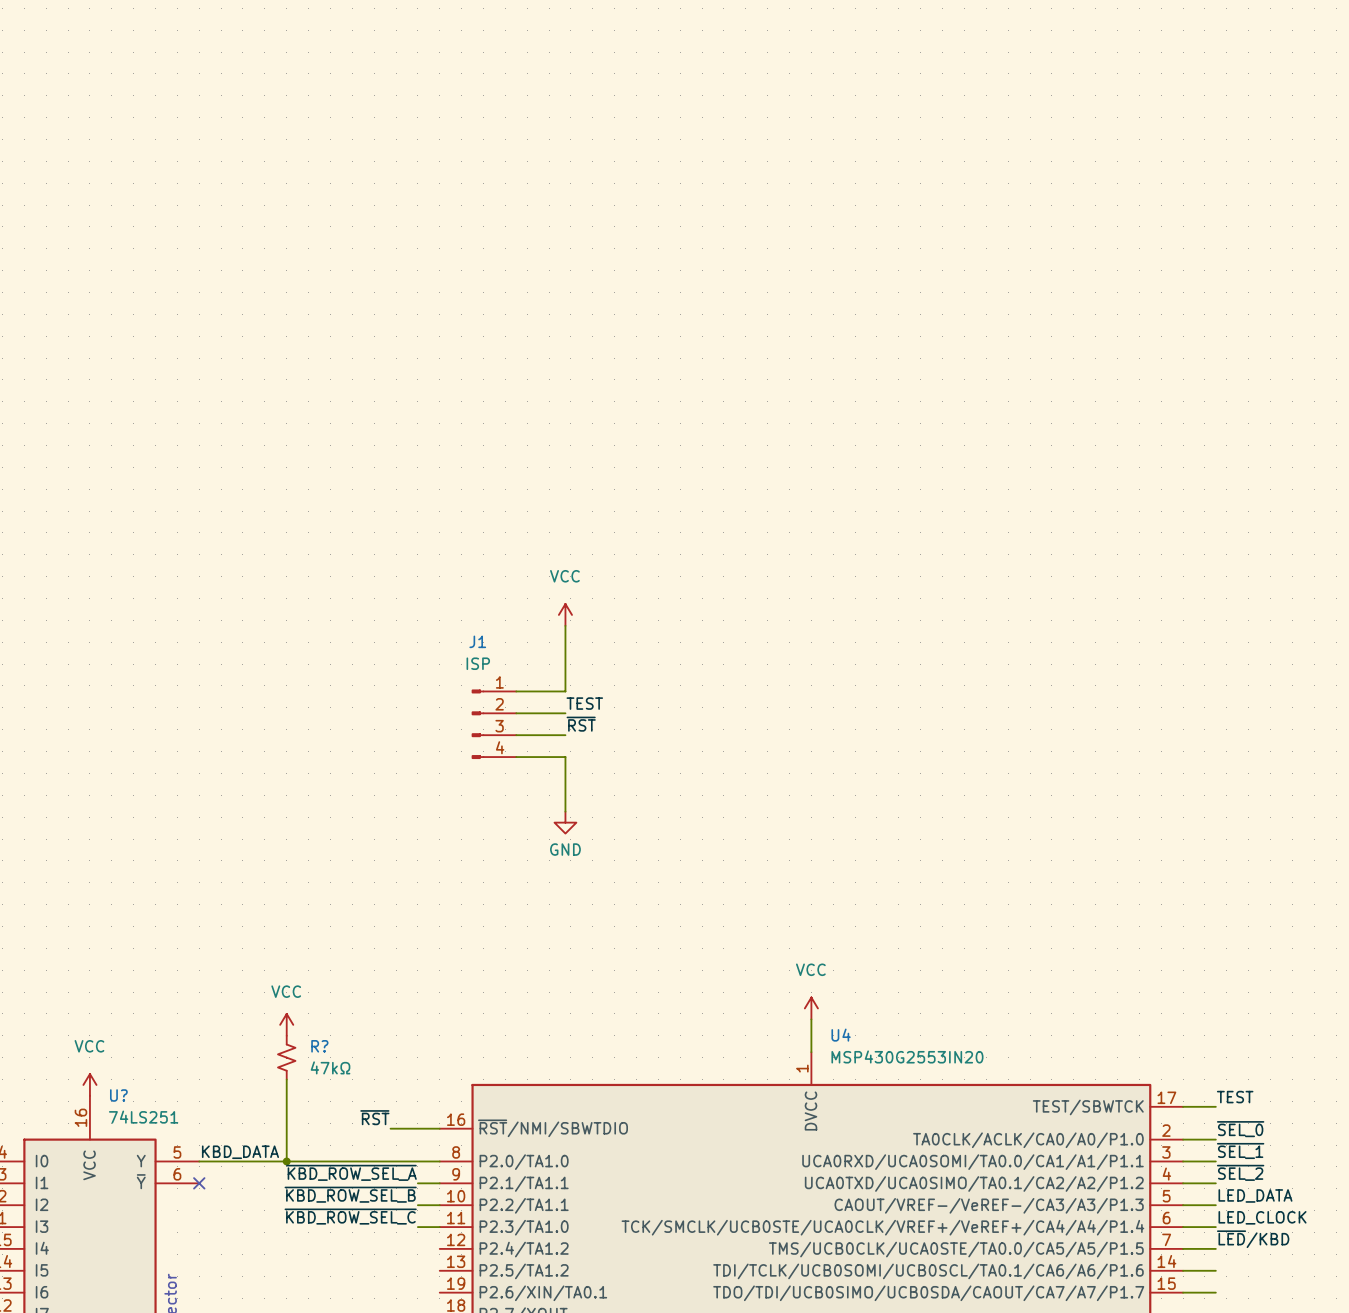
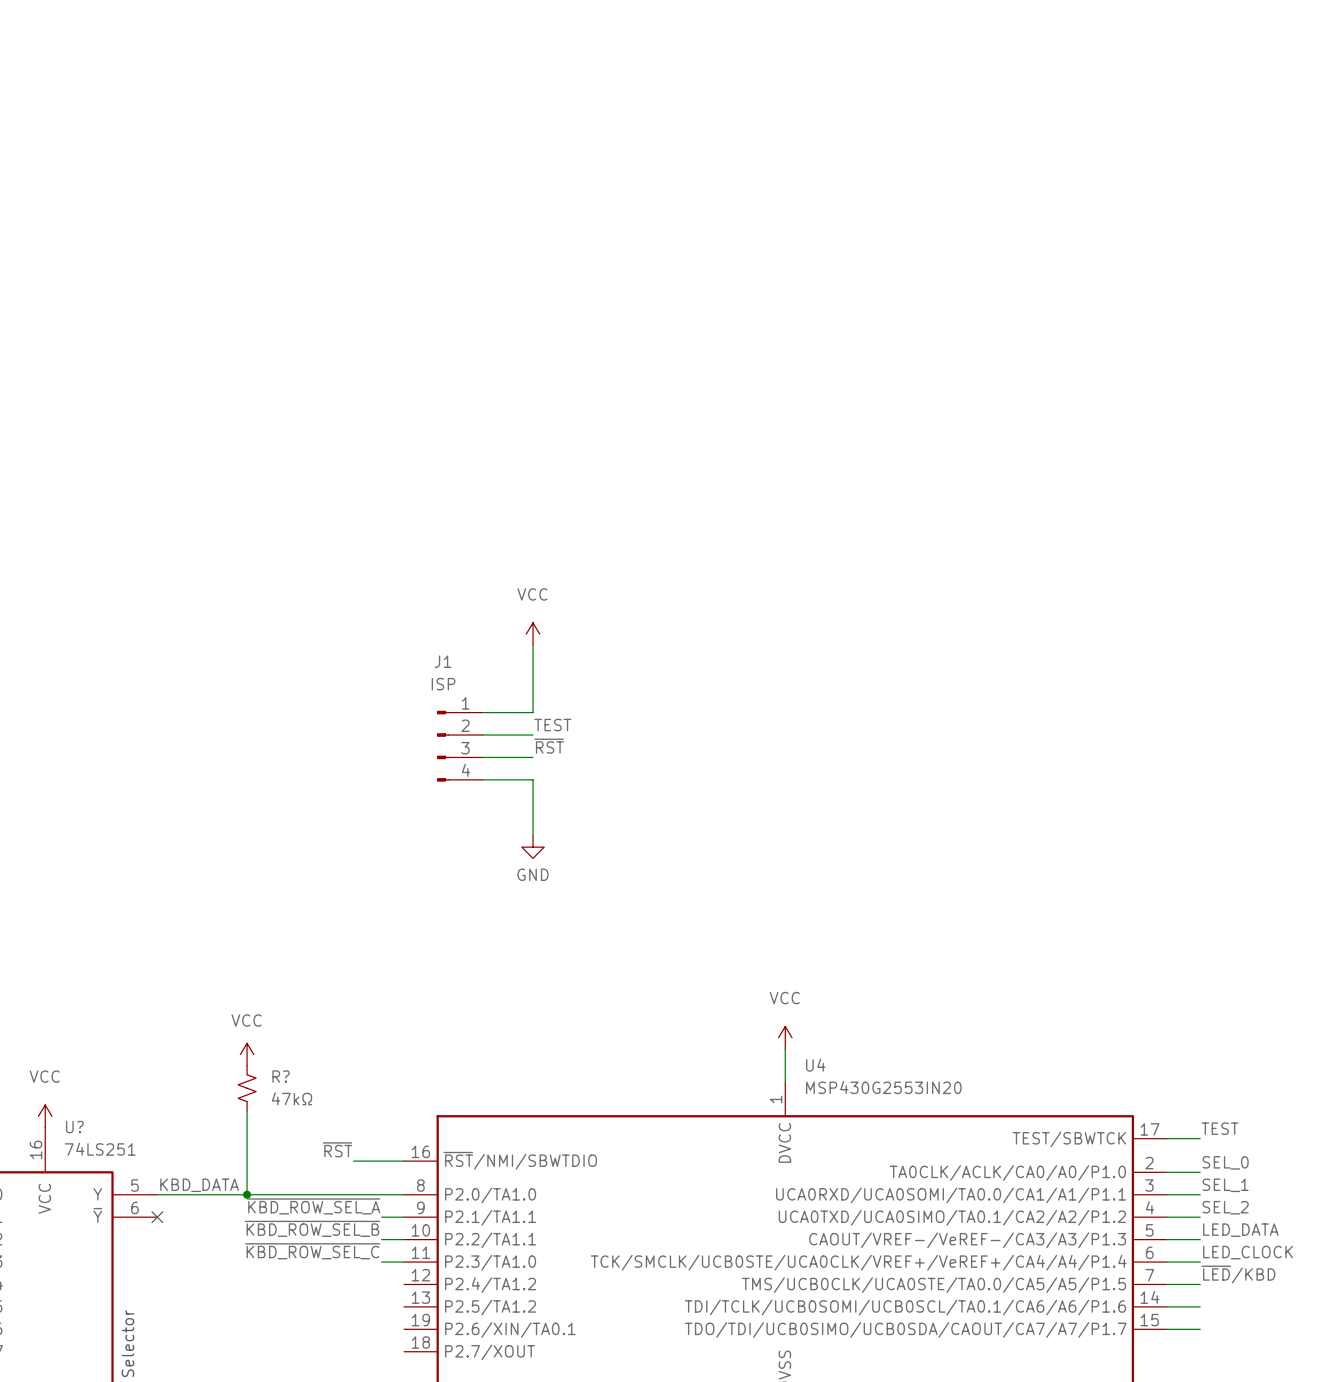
label: ~{SEL_0} (1240, 1129) -> SEL_0 (1225, 1162)
label: ~{SEL_1} (1240, 1150) -> SEL_1 (1225, 1185)
label: ~{SEL_2} (1240, 1172) -> SEL_2 (1225, 1207)

